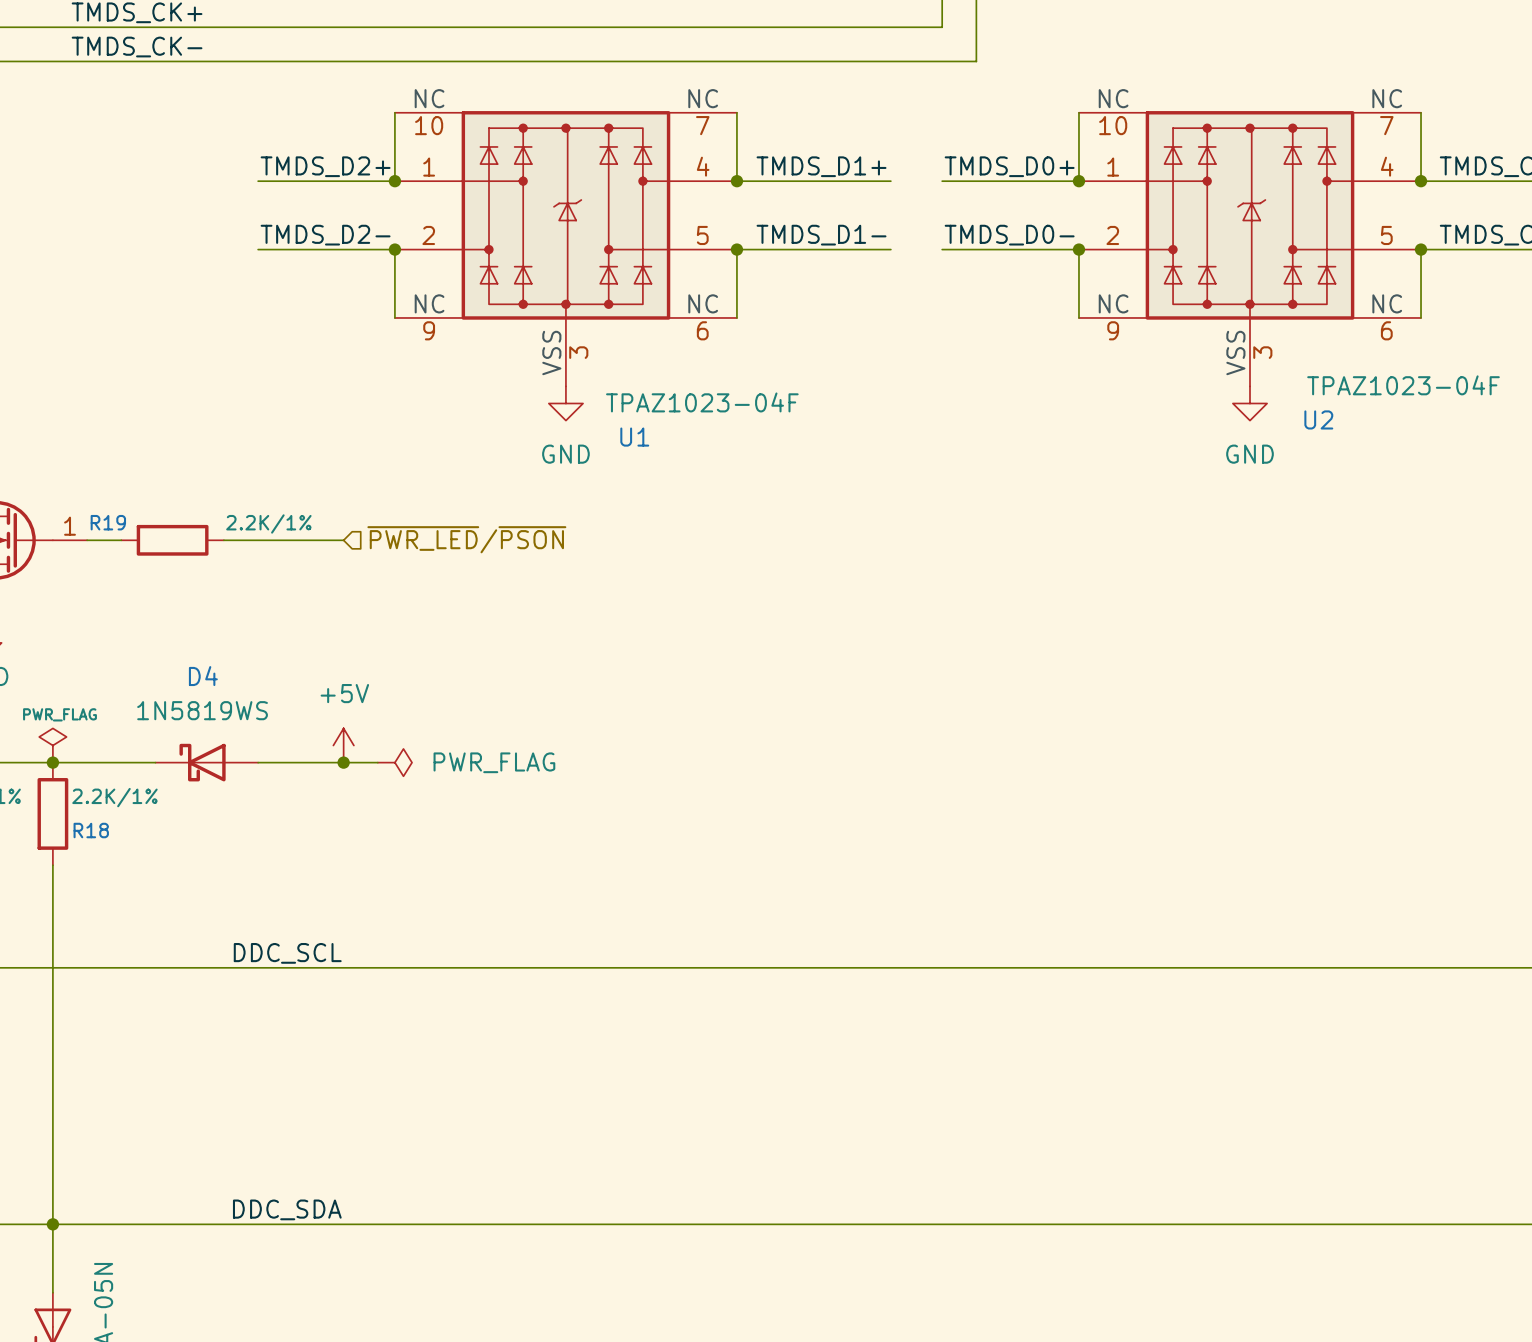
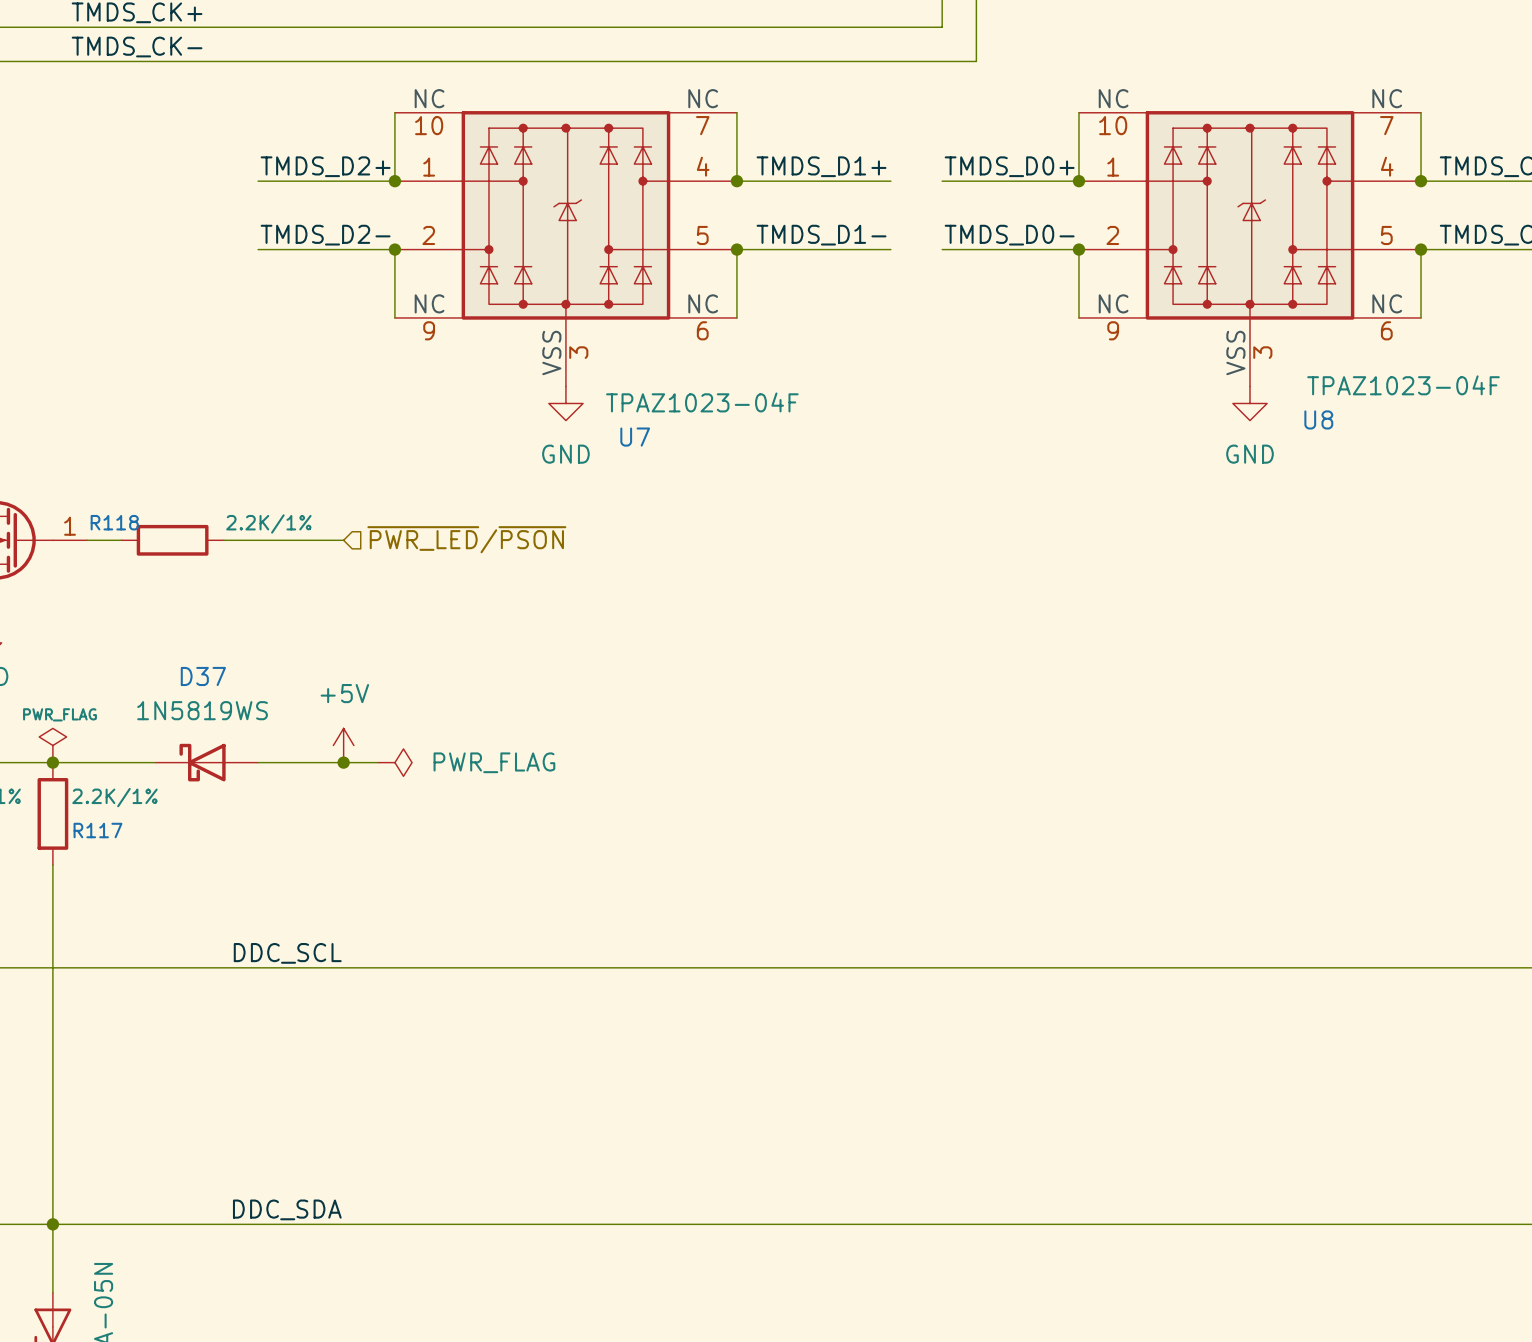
U2 name: U2 (1318, 419) -> U8 (1318, 419)
U1 name: U1 (634, 437) -> U7 (635, 437)
R19 name: R19 (108, 522) -> R118 (114, 522)
D4 name: D4 (203, 676) -> D37 (203, 676)
R18 name: R18 (91, 830) -> R117 (97, 830)

